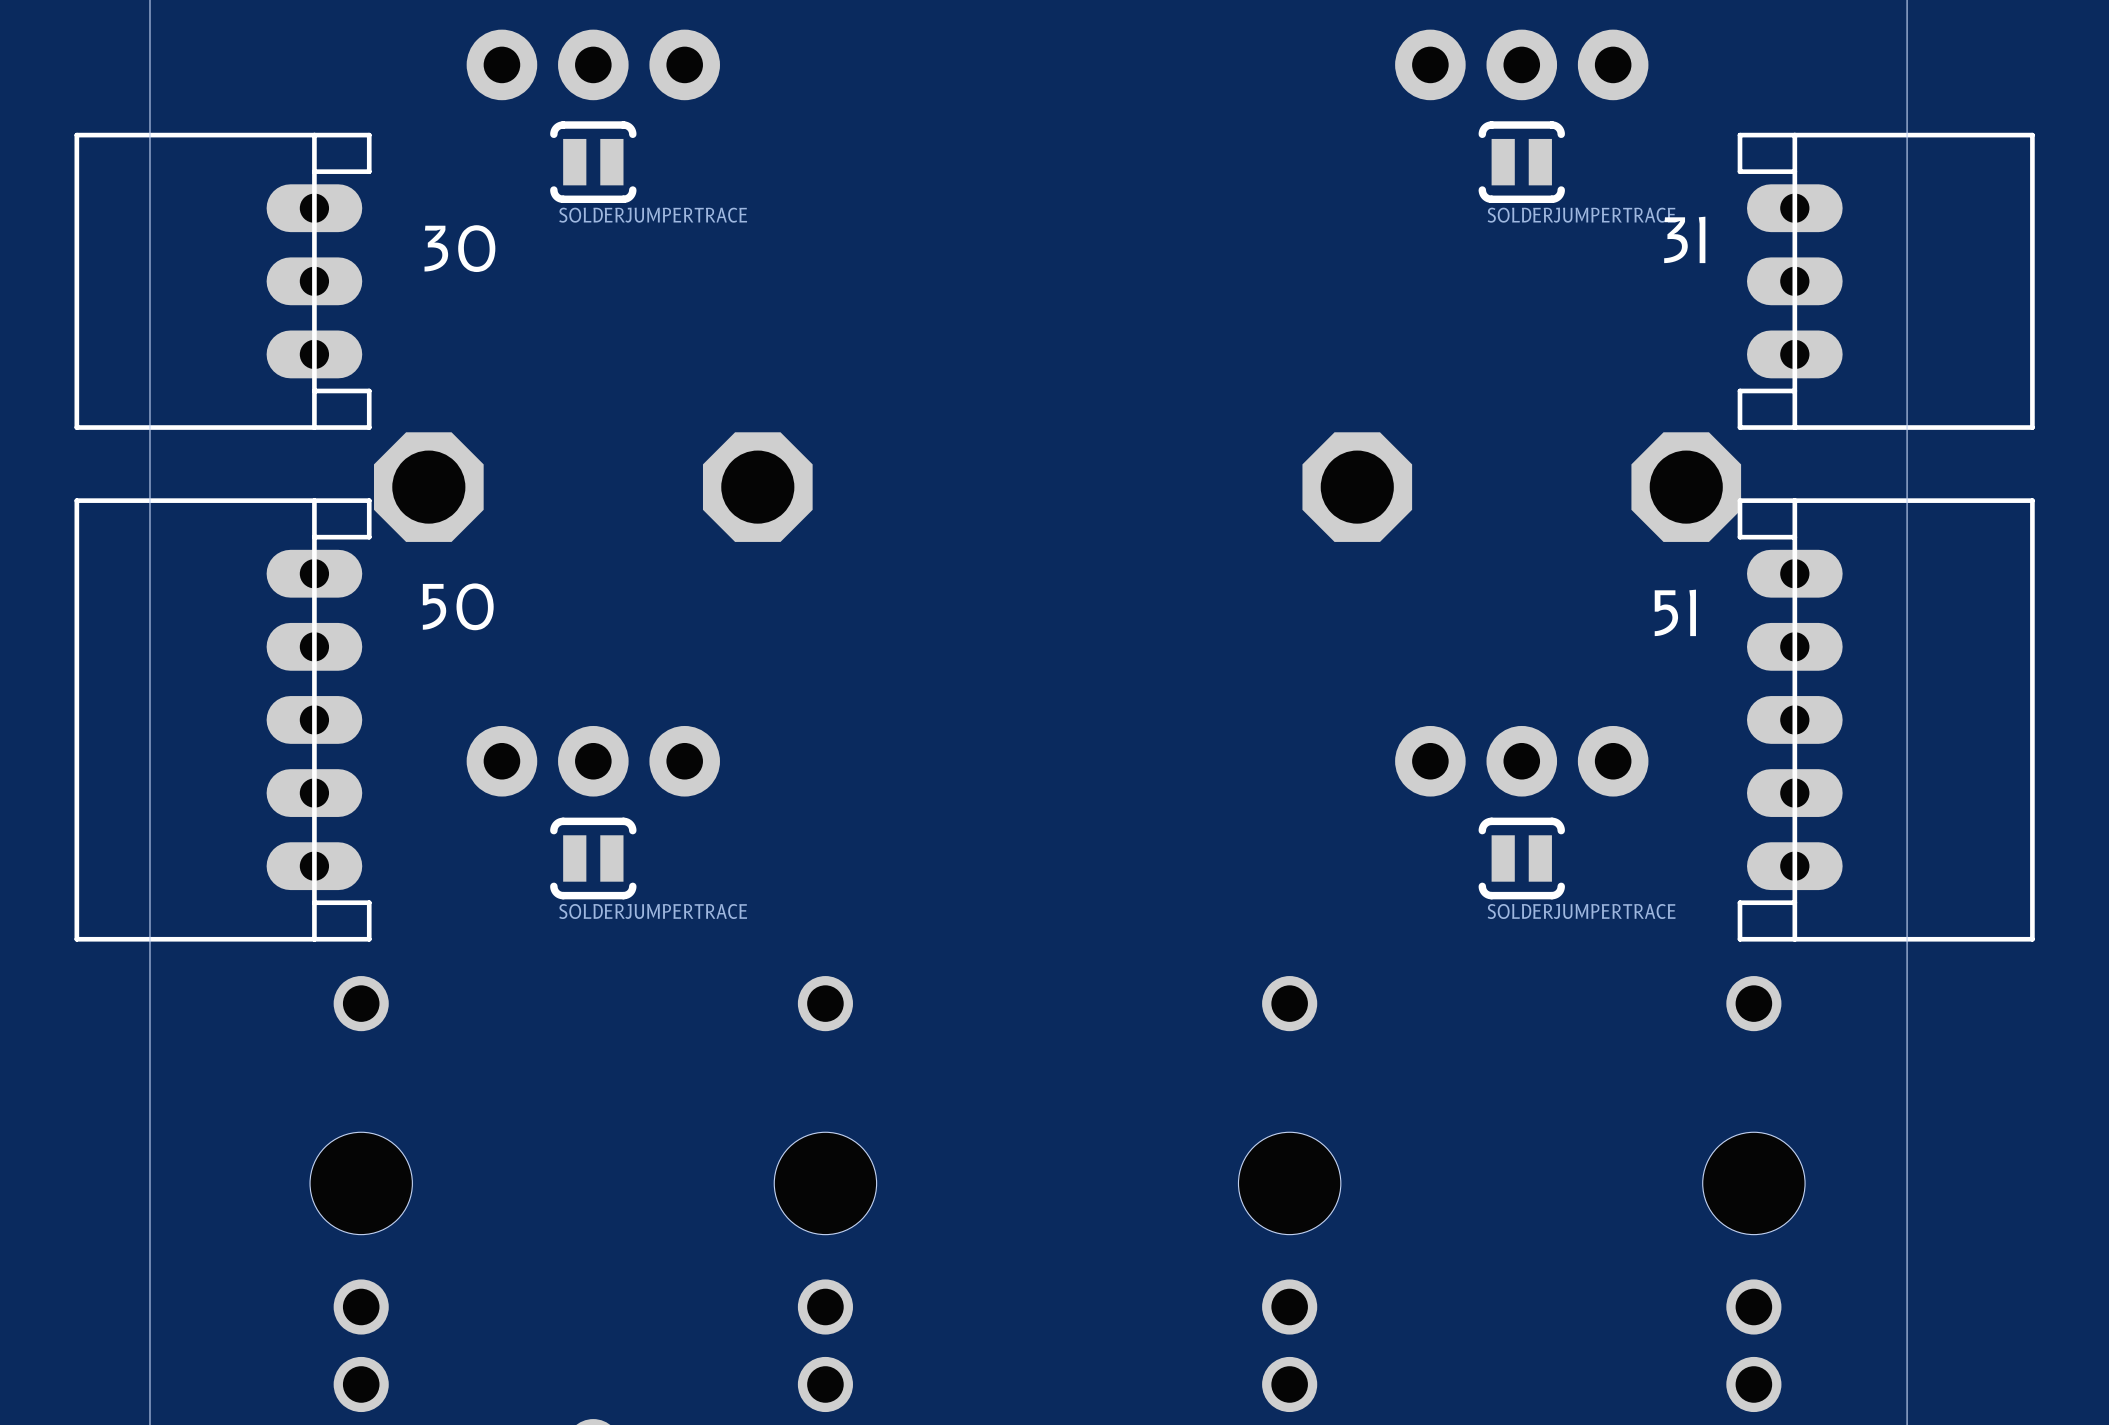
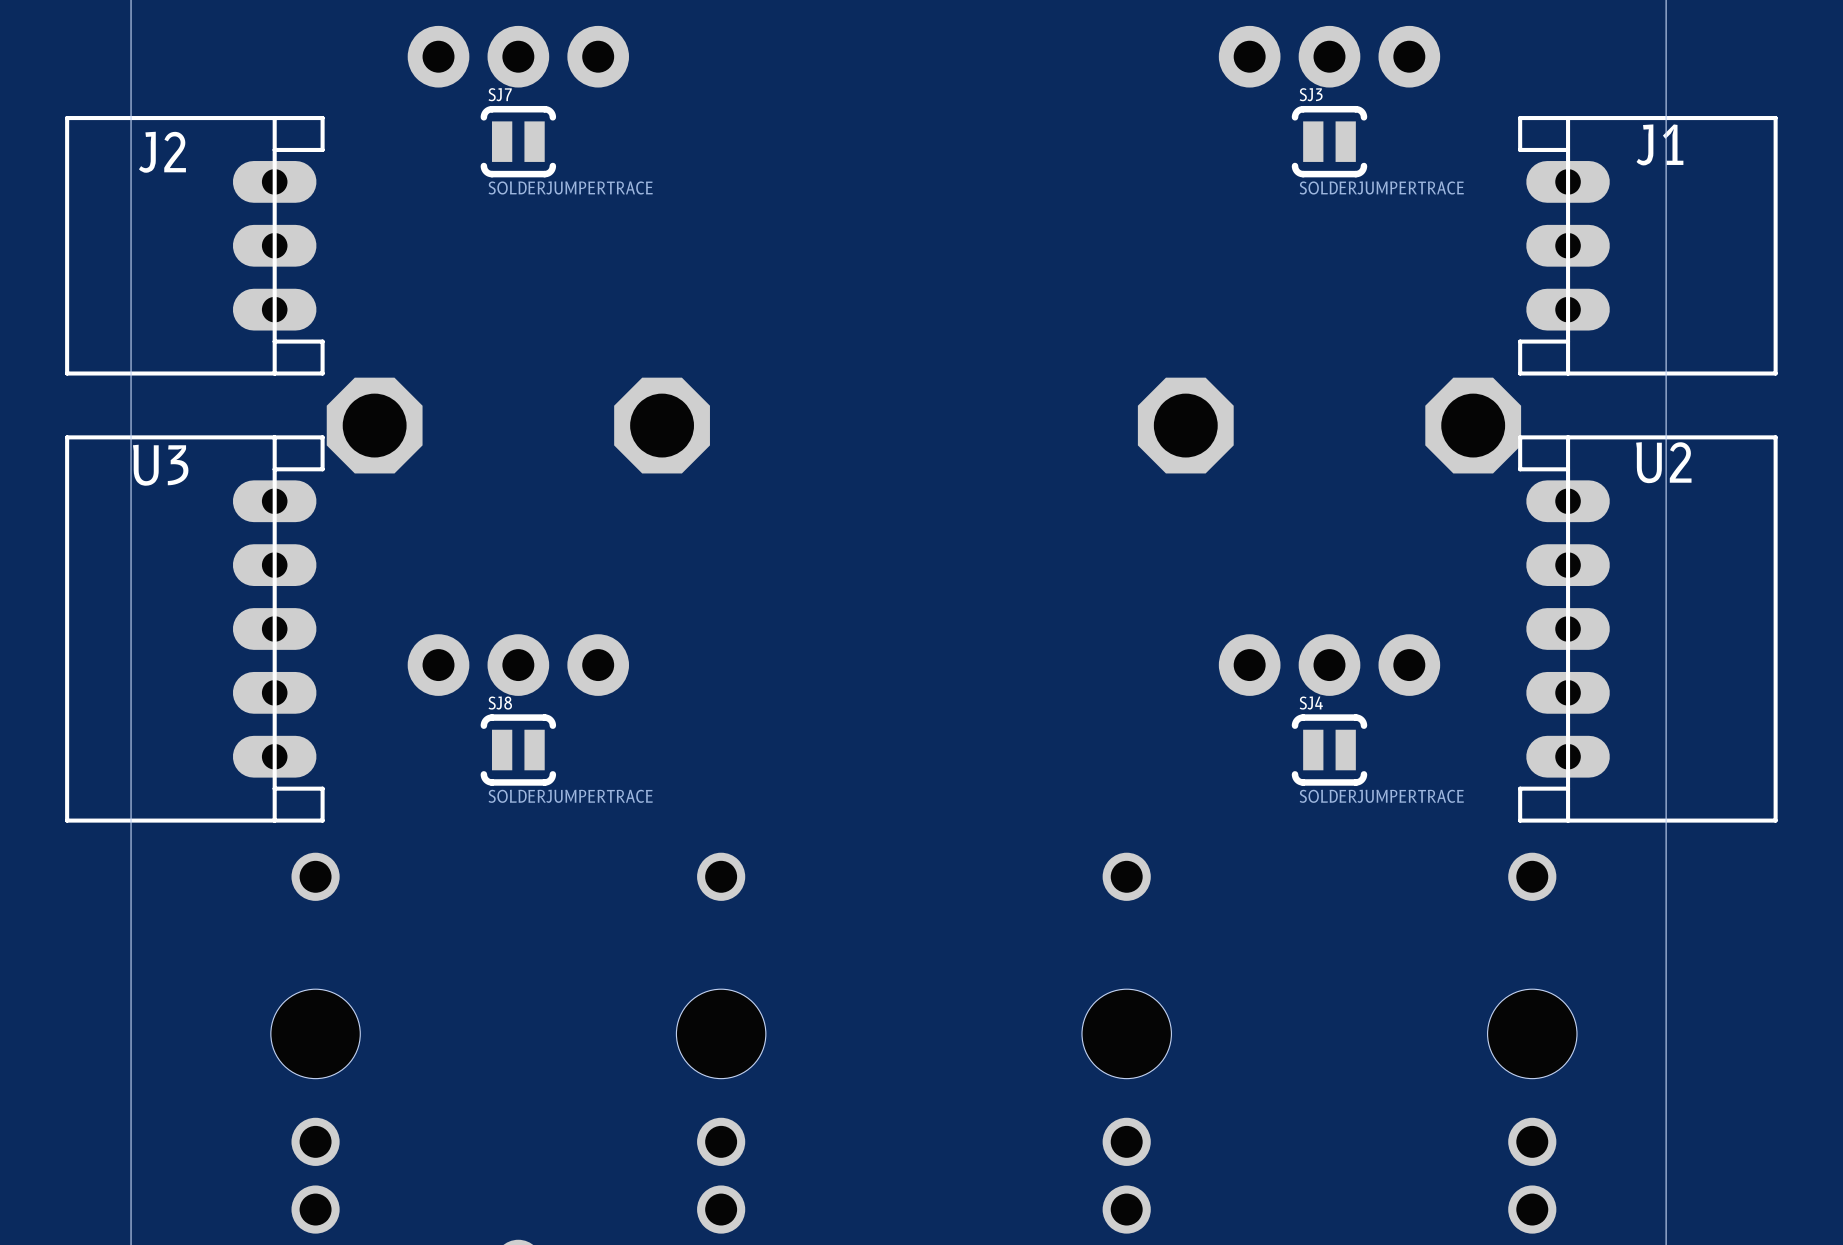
SJ7 name: none -> SJ7 (500, 94)
SJ3 name: none -> SJ3 (1311, 94)
3I name: 3I (1684, 239) -> J1 (1659, 144)
3O name: 3O (459, 248) -> J2 (162, 152)
5O name: 5O (458, 606) -> U3 (160, 465)
5I name: 5I (1675, 612) -> U2 (1663, 462)
SJ8 name: none -> SJ8 (500, 703)
SJ4 name: none -> SJ4 (1311, 703)

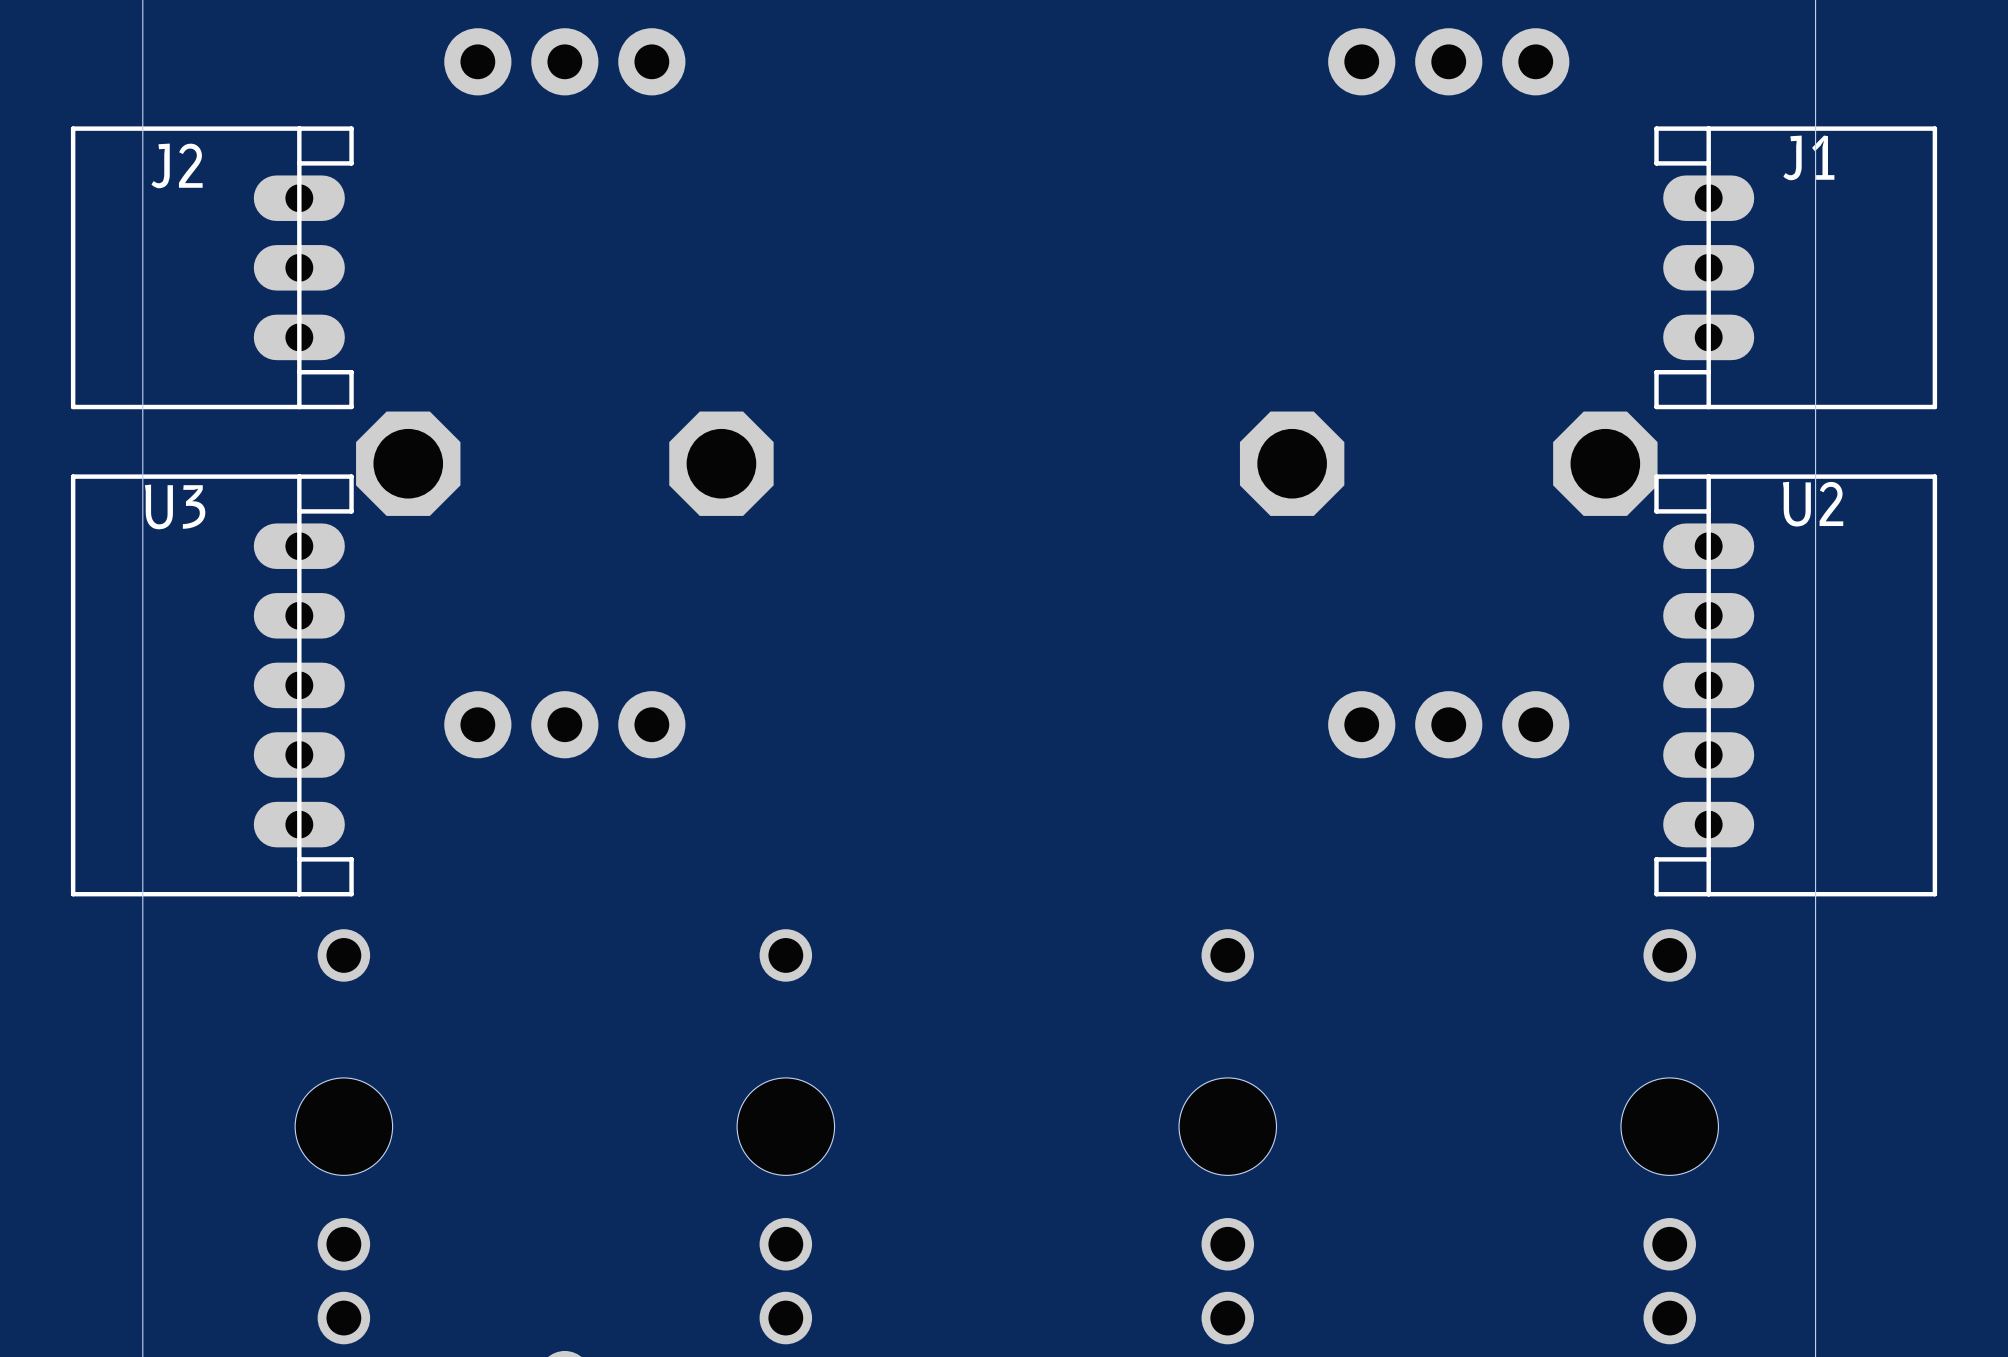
SJ7: SOLDERJUMPERTRACE (518, 141) -> none
SJ3: SOLDERJUMPERTRACE (1329, 141) -> none
SJ8: SOLDERJUMPERTRACE (518, 750) -> none
SJ4: SOLDERJUMPERTRACE (1329, 750) -> none

